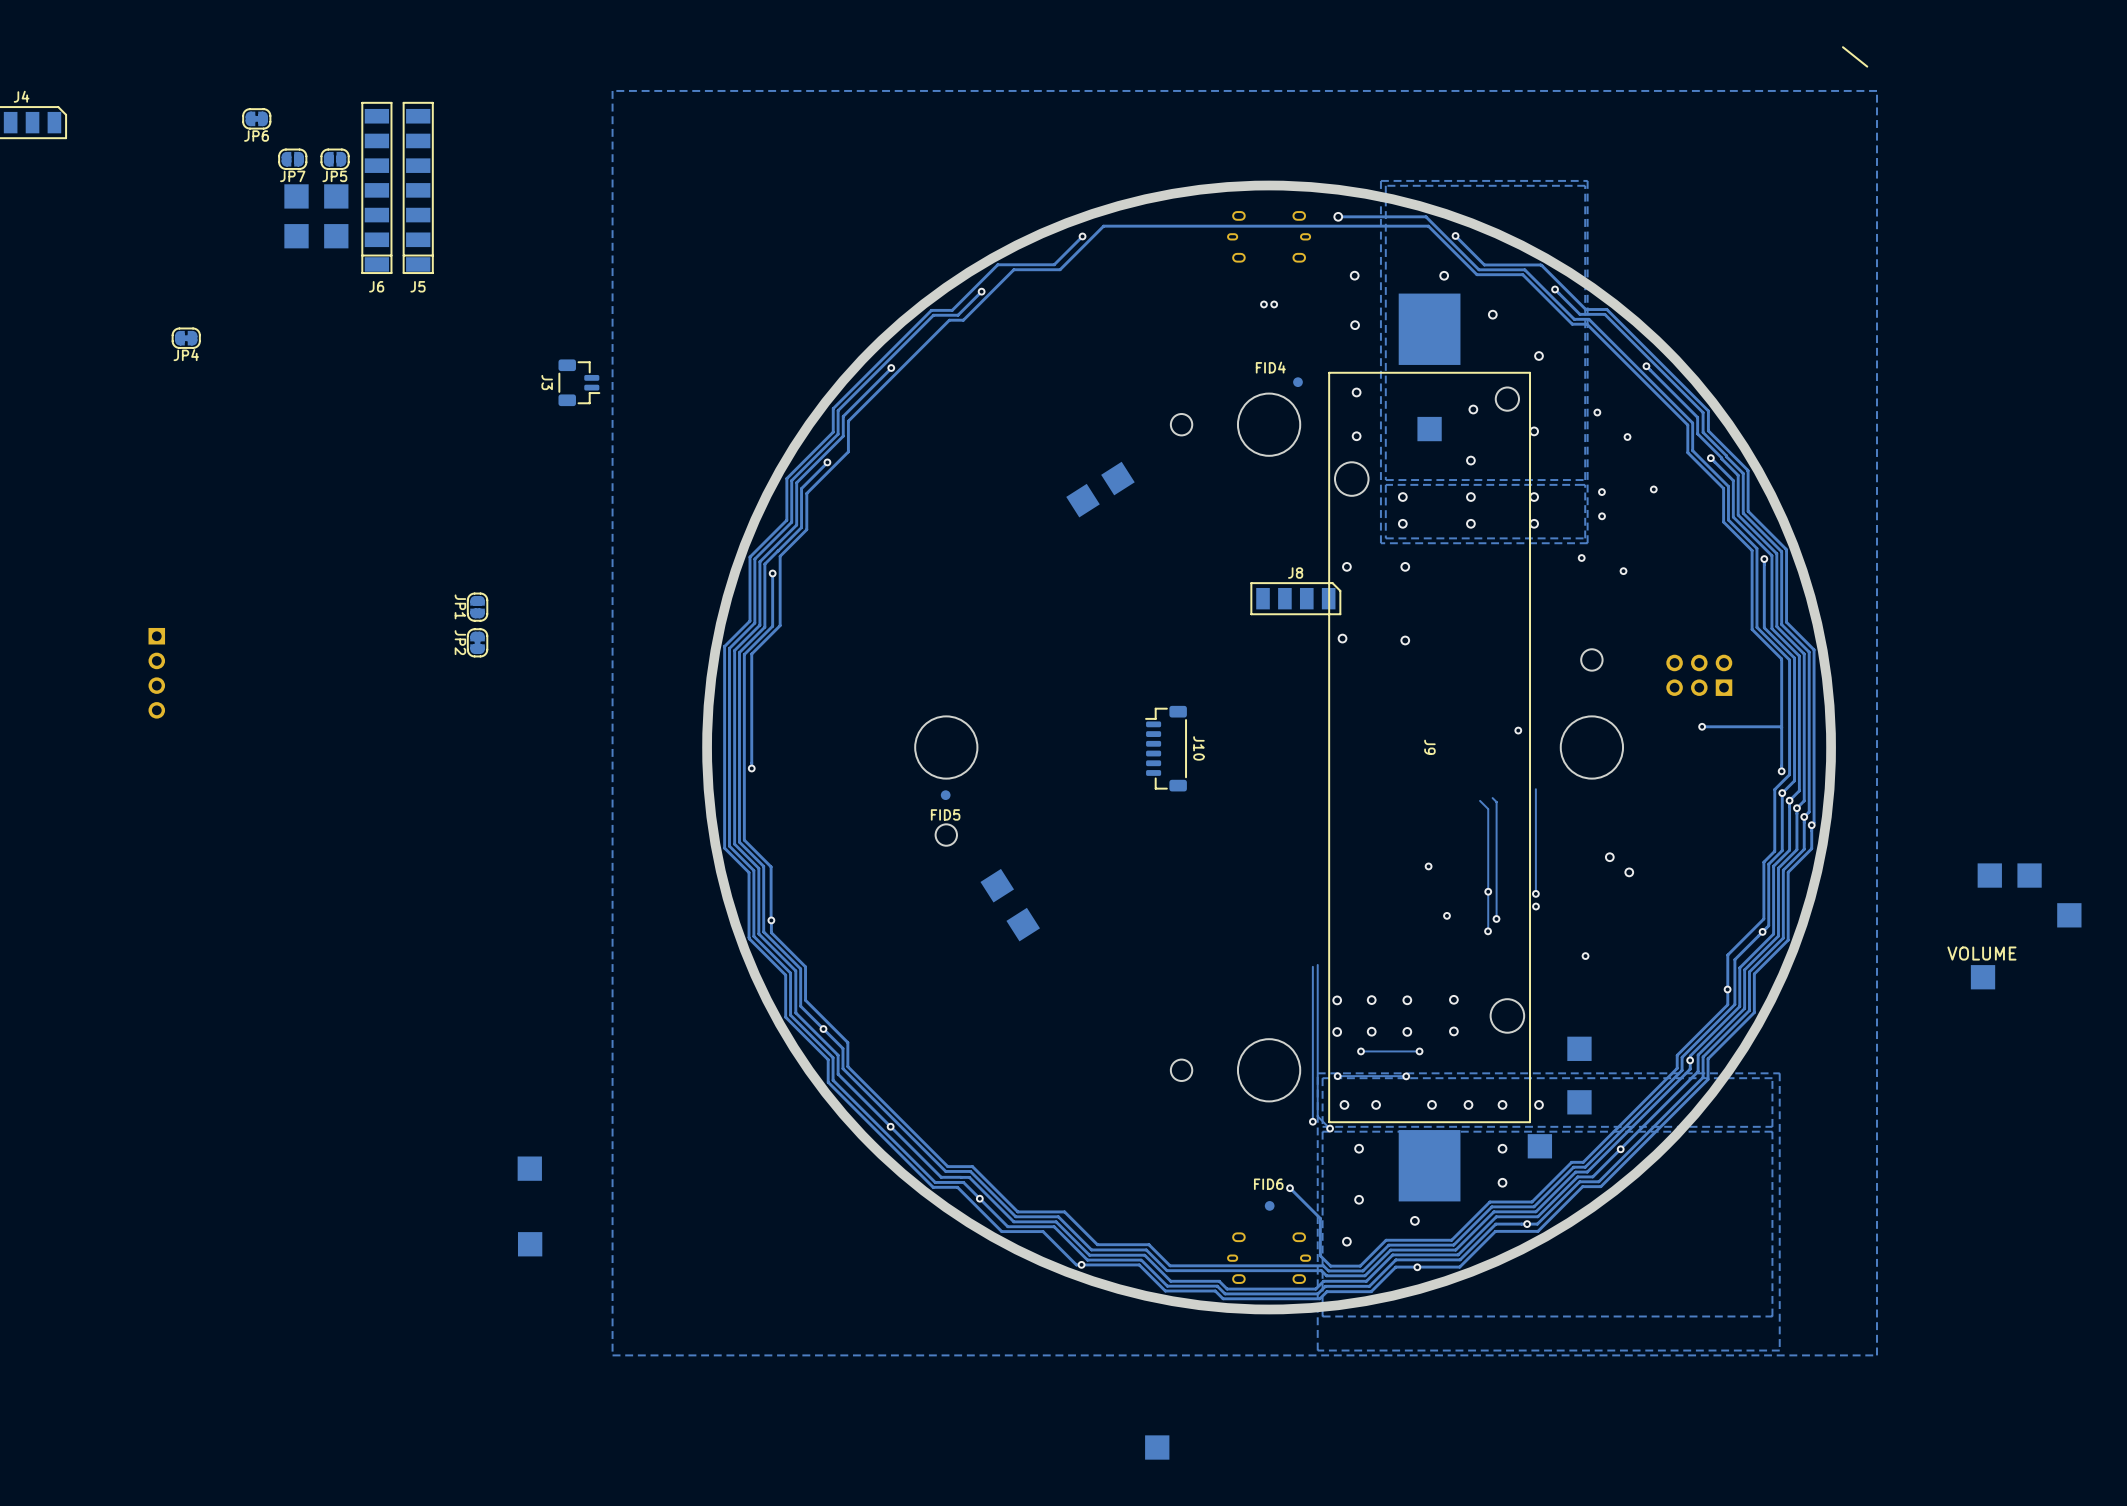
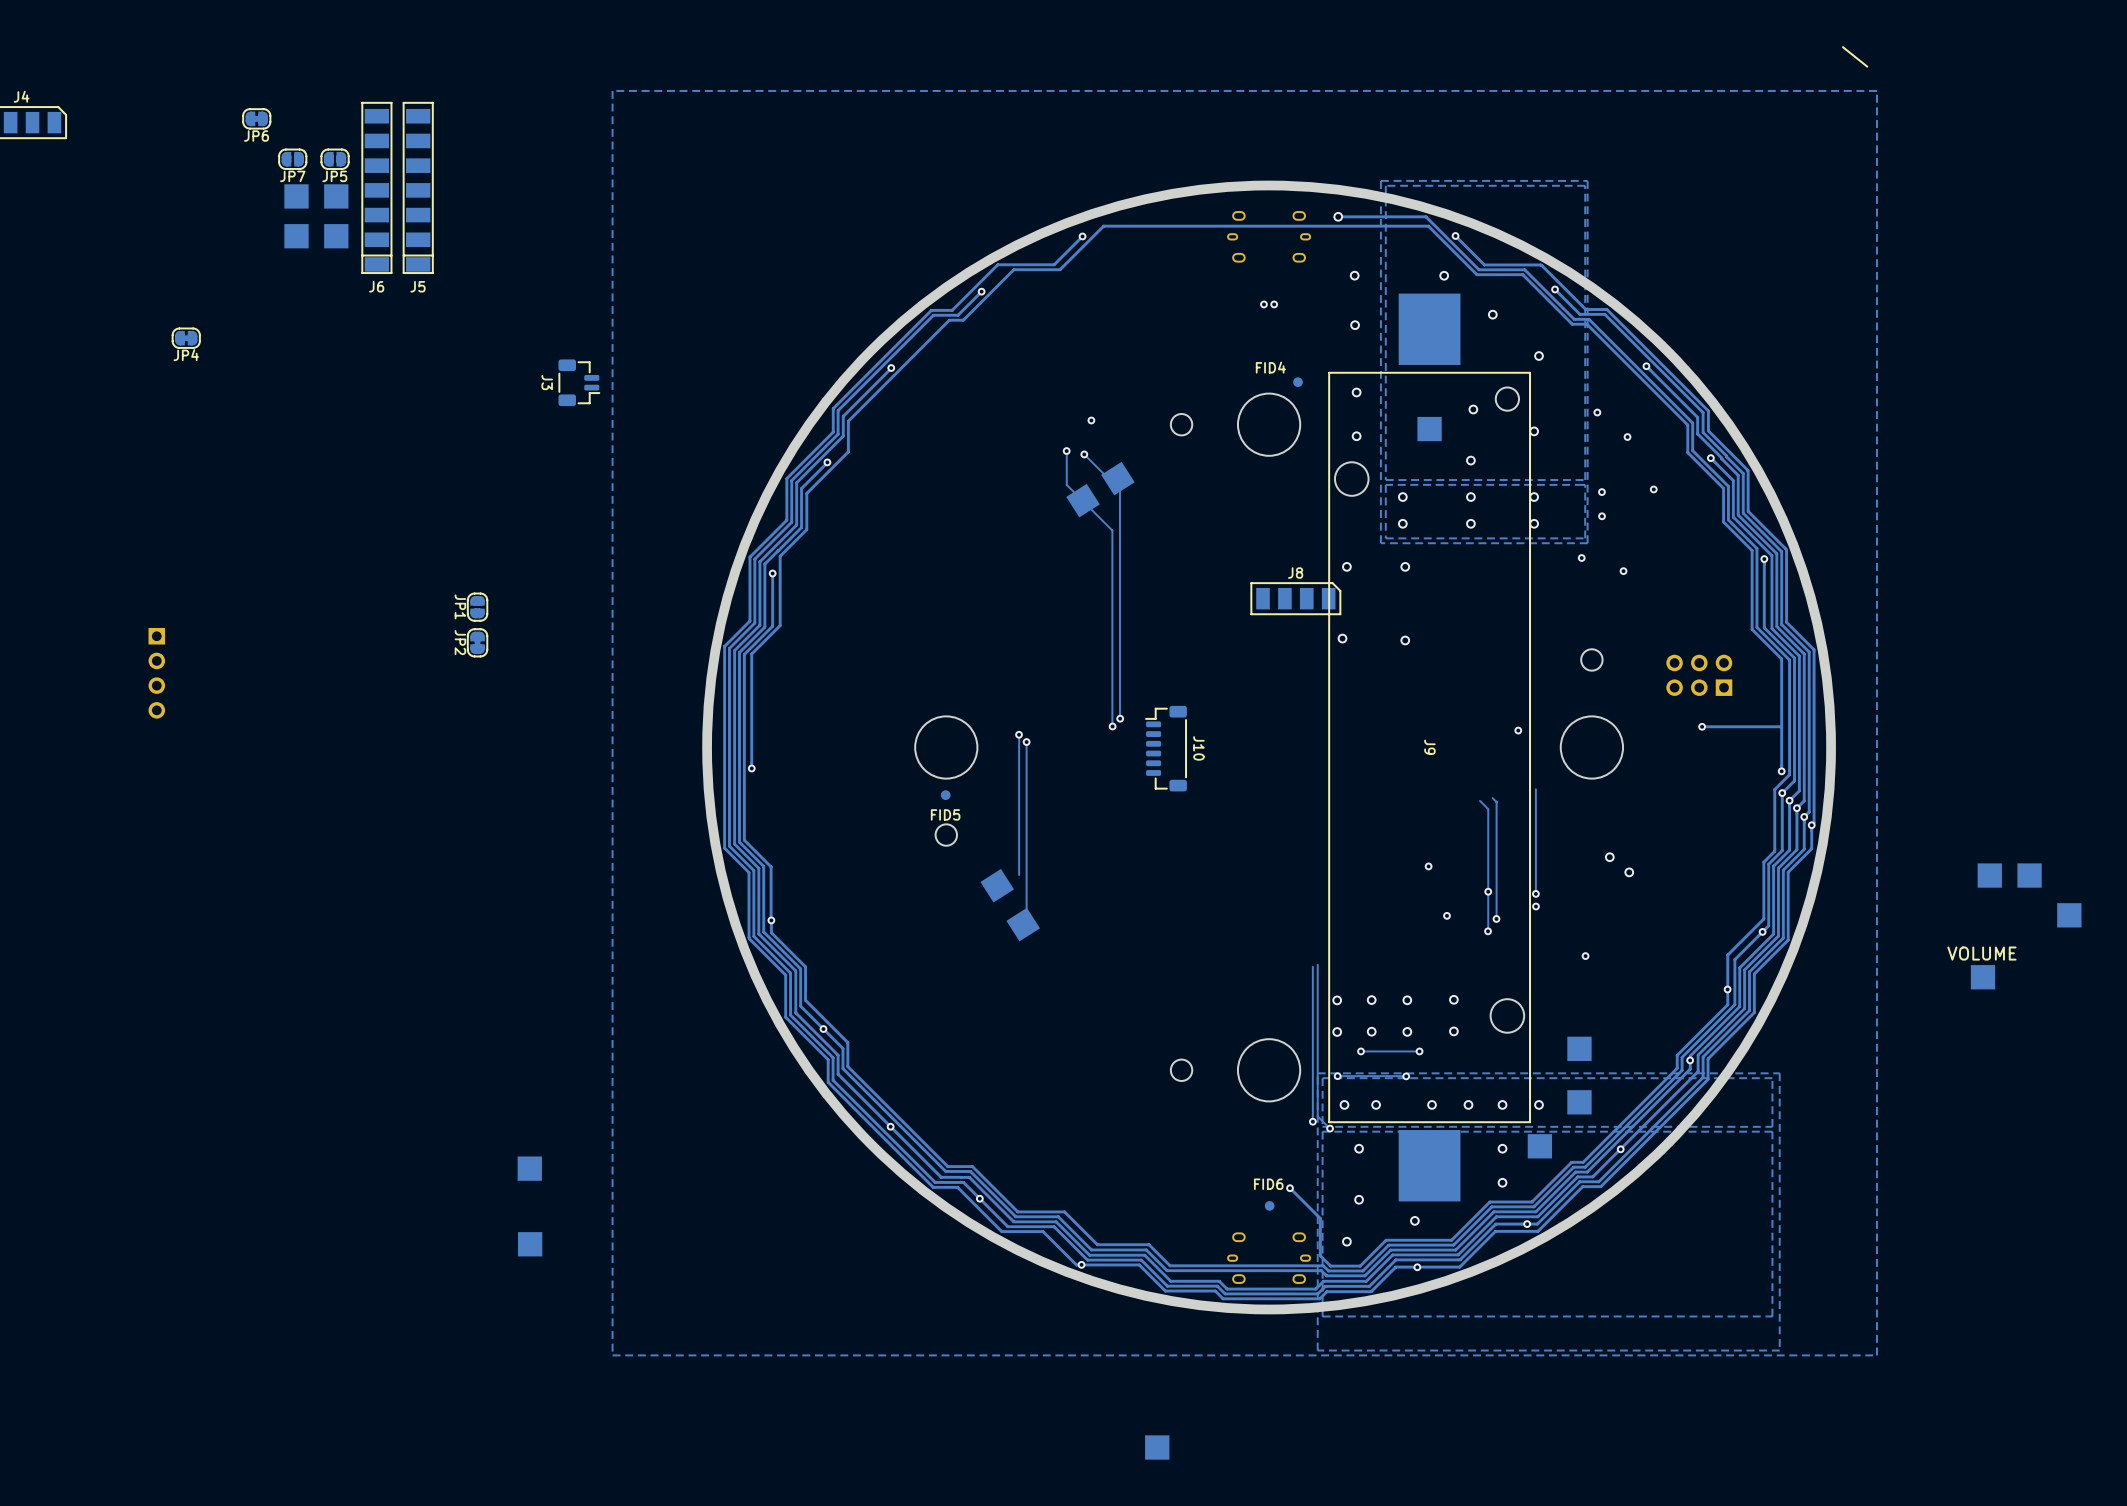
via: none -> (1091, 420)
track: none -> (1066, 451) (1066, 484) (1112, 530) (1112, 726)
via: none -> (1066, 451)
track: none -> (1084, 454) (1119, 490) (1120, 718)
via: none -> (1084, 454)
via: none -> (1120, 718)
via: none -> (1112, 726)
track: none -> (1019, 734) (1019, 875)
via: none -> (1019, 734)
track: none -> (1026, 742) (1026, 910)
via: none -> (1026, 742)

